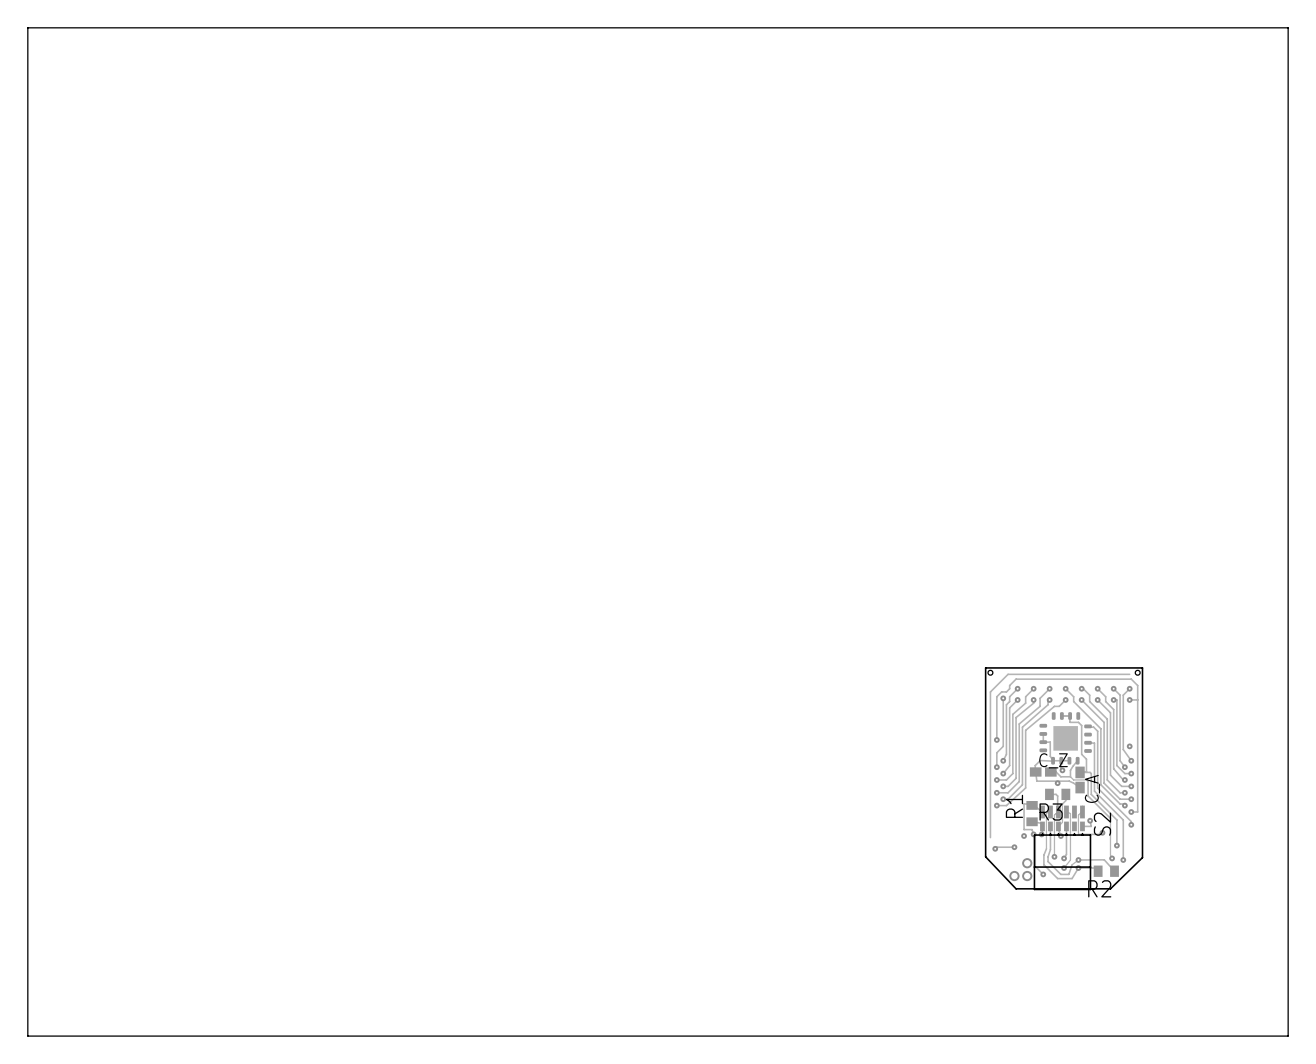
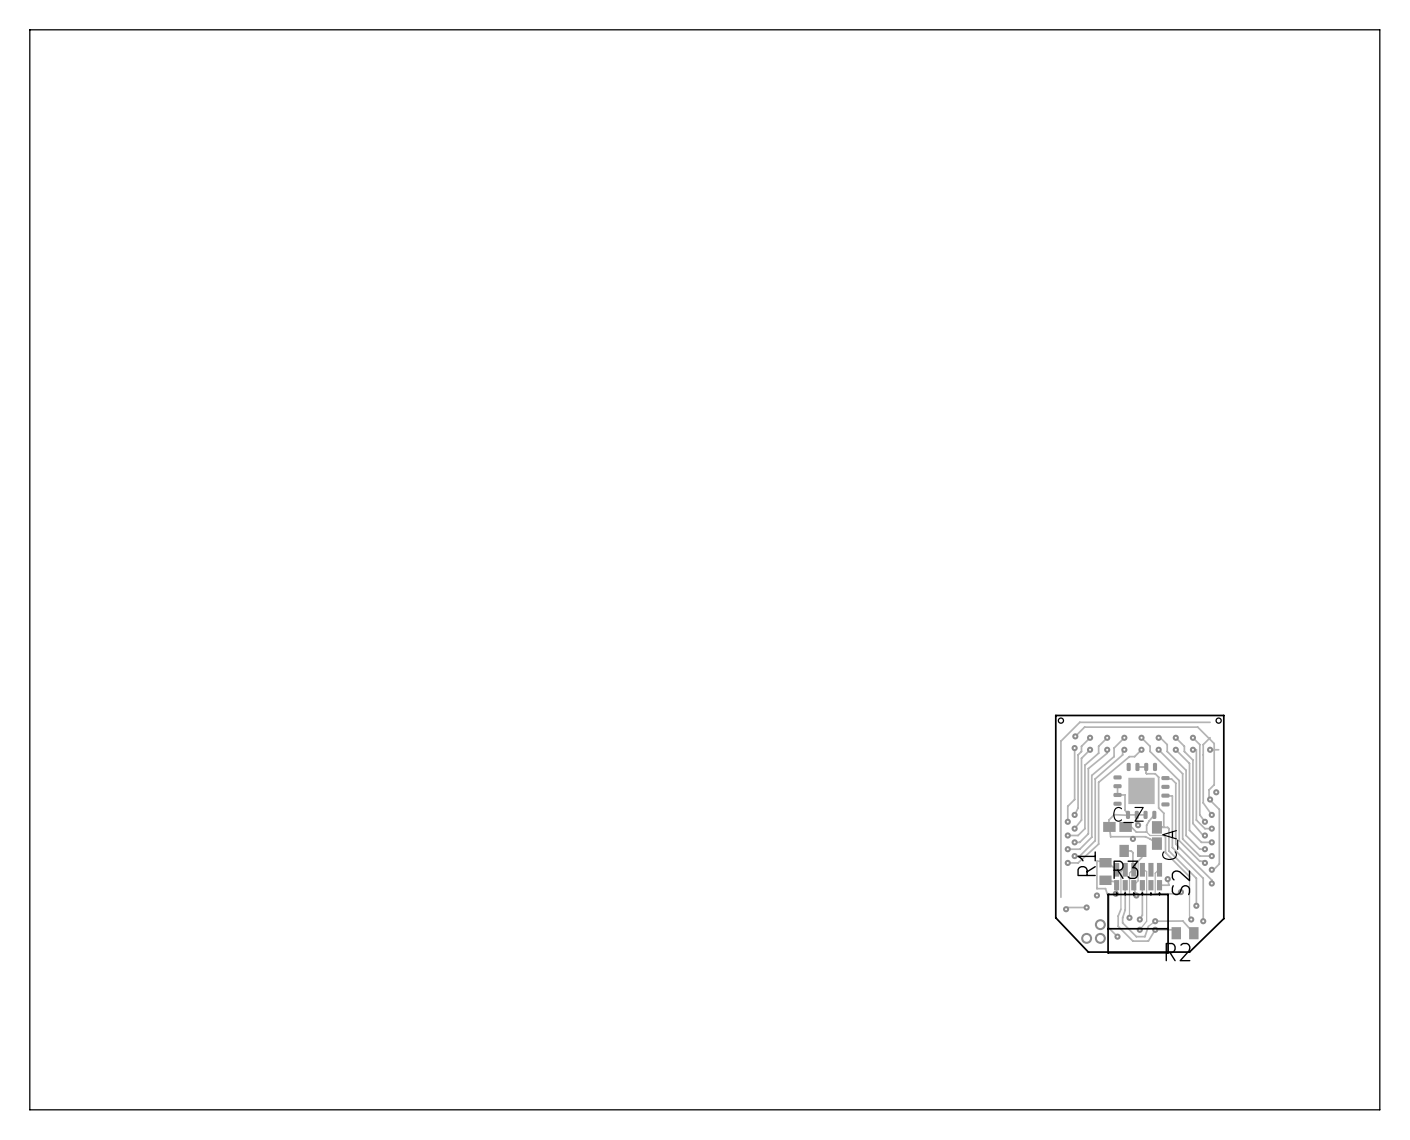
via position: (1129, 688) -> (1216, 792)
track: (996, 739) (996, 696) (1001, 691) (1006, 691) (1016, 679) (1131, 679) (1137, 685) (1137, 812) (1131, 812) -> (1075, 736) (1084, 727) (1197, 727) (1214, 743) (1214, 784) (1209, 789) (1209, 799) (1219, 809) (1219, 863) (1212, 870)
via position: (996, 739) -> (1075, 736)
via: (1033, 834) -> none

